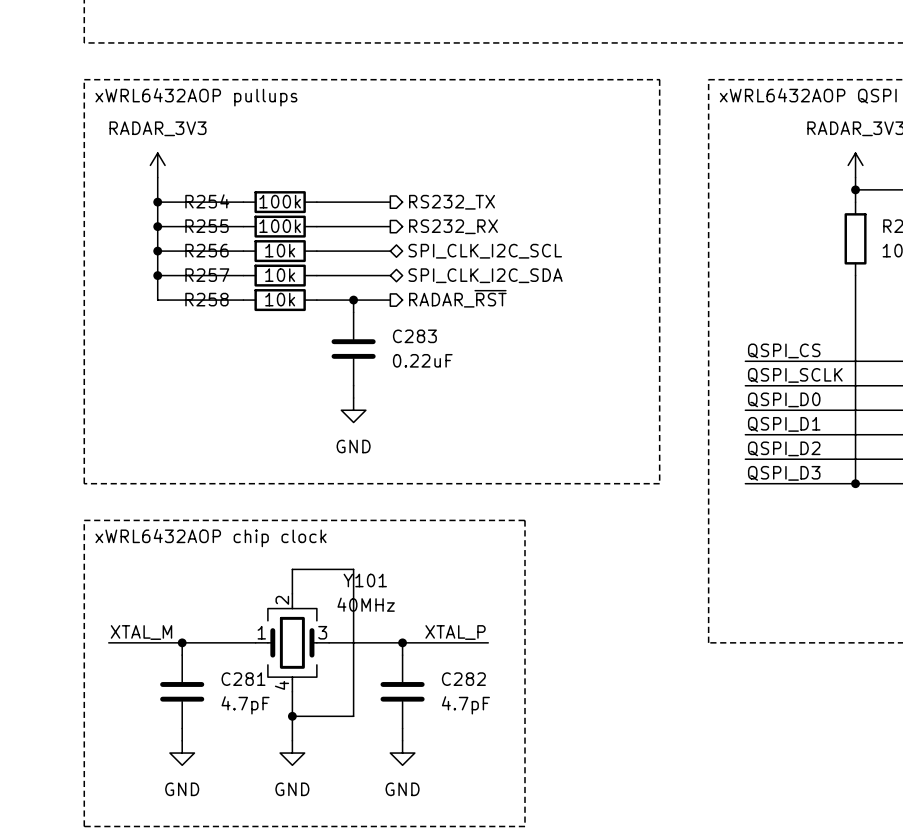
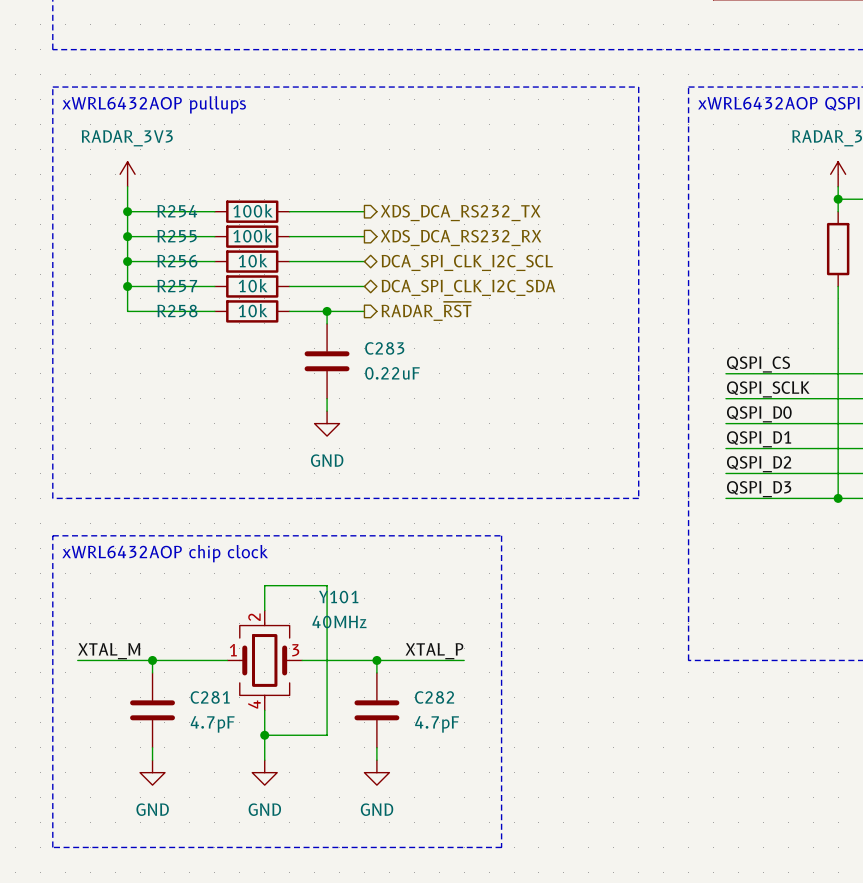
hierarchical label: RS232_TX (452, 202) -> XDS_DCA_RS232_TX (460, 213)
hierarchical label: RS232_RX (453, 226) -> XDS_DCA_RS232_RX (461, 238)
hierarchical label: SPI_CLK_I2C_SCL (485, 251) -> DCA_SPI_CLK_I2C_SCL (467, 262)
hierarchical label: SPI_CLK_I2C_SDA (485, 275) -> DCA_SPI_CLK_I2C_SDA (468, 287)

